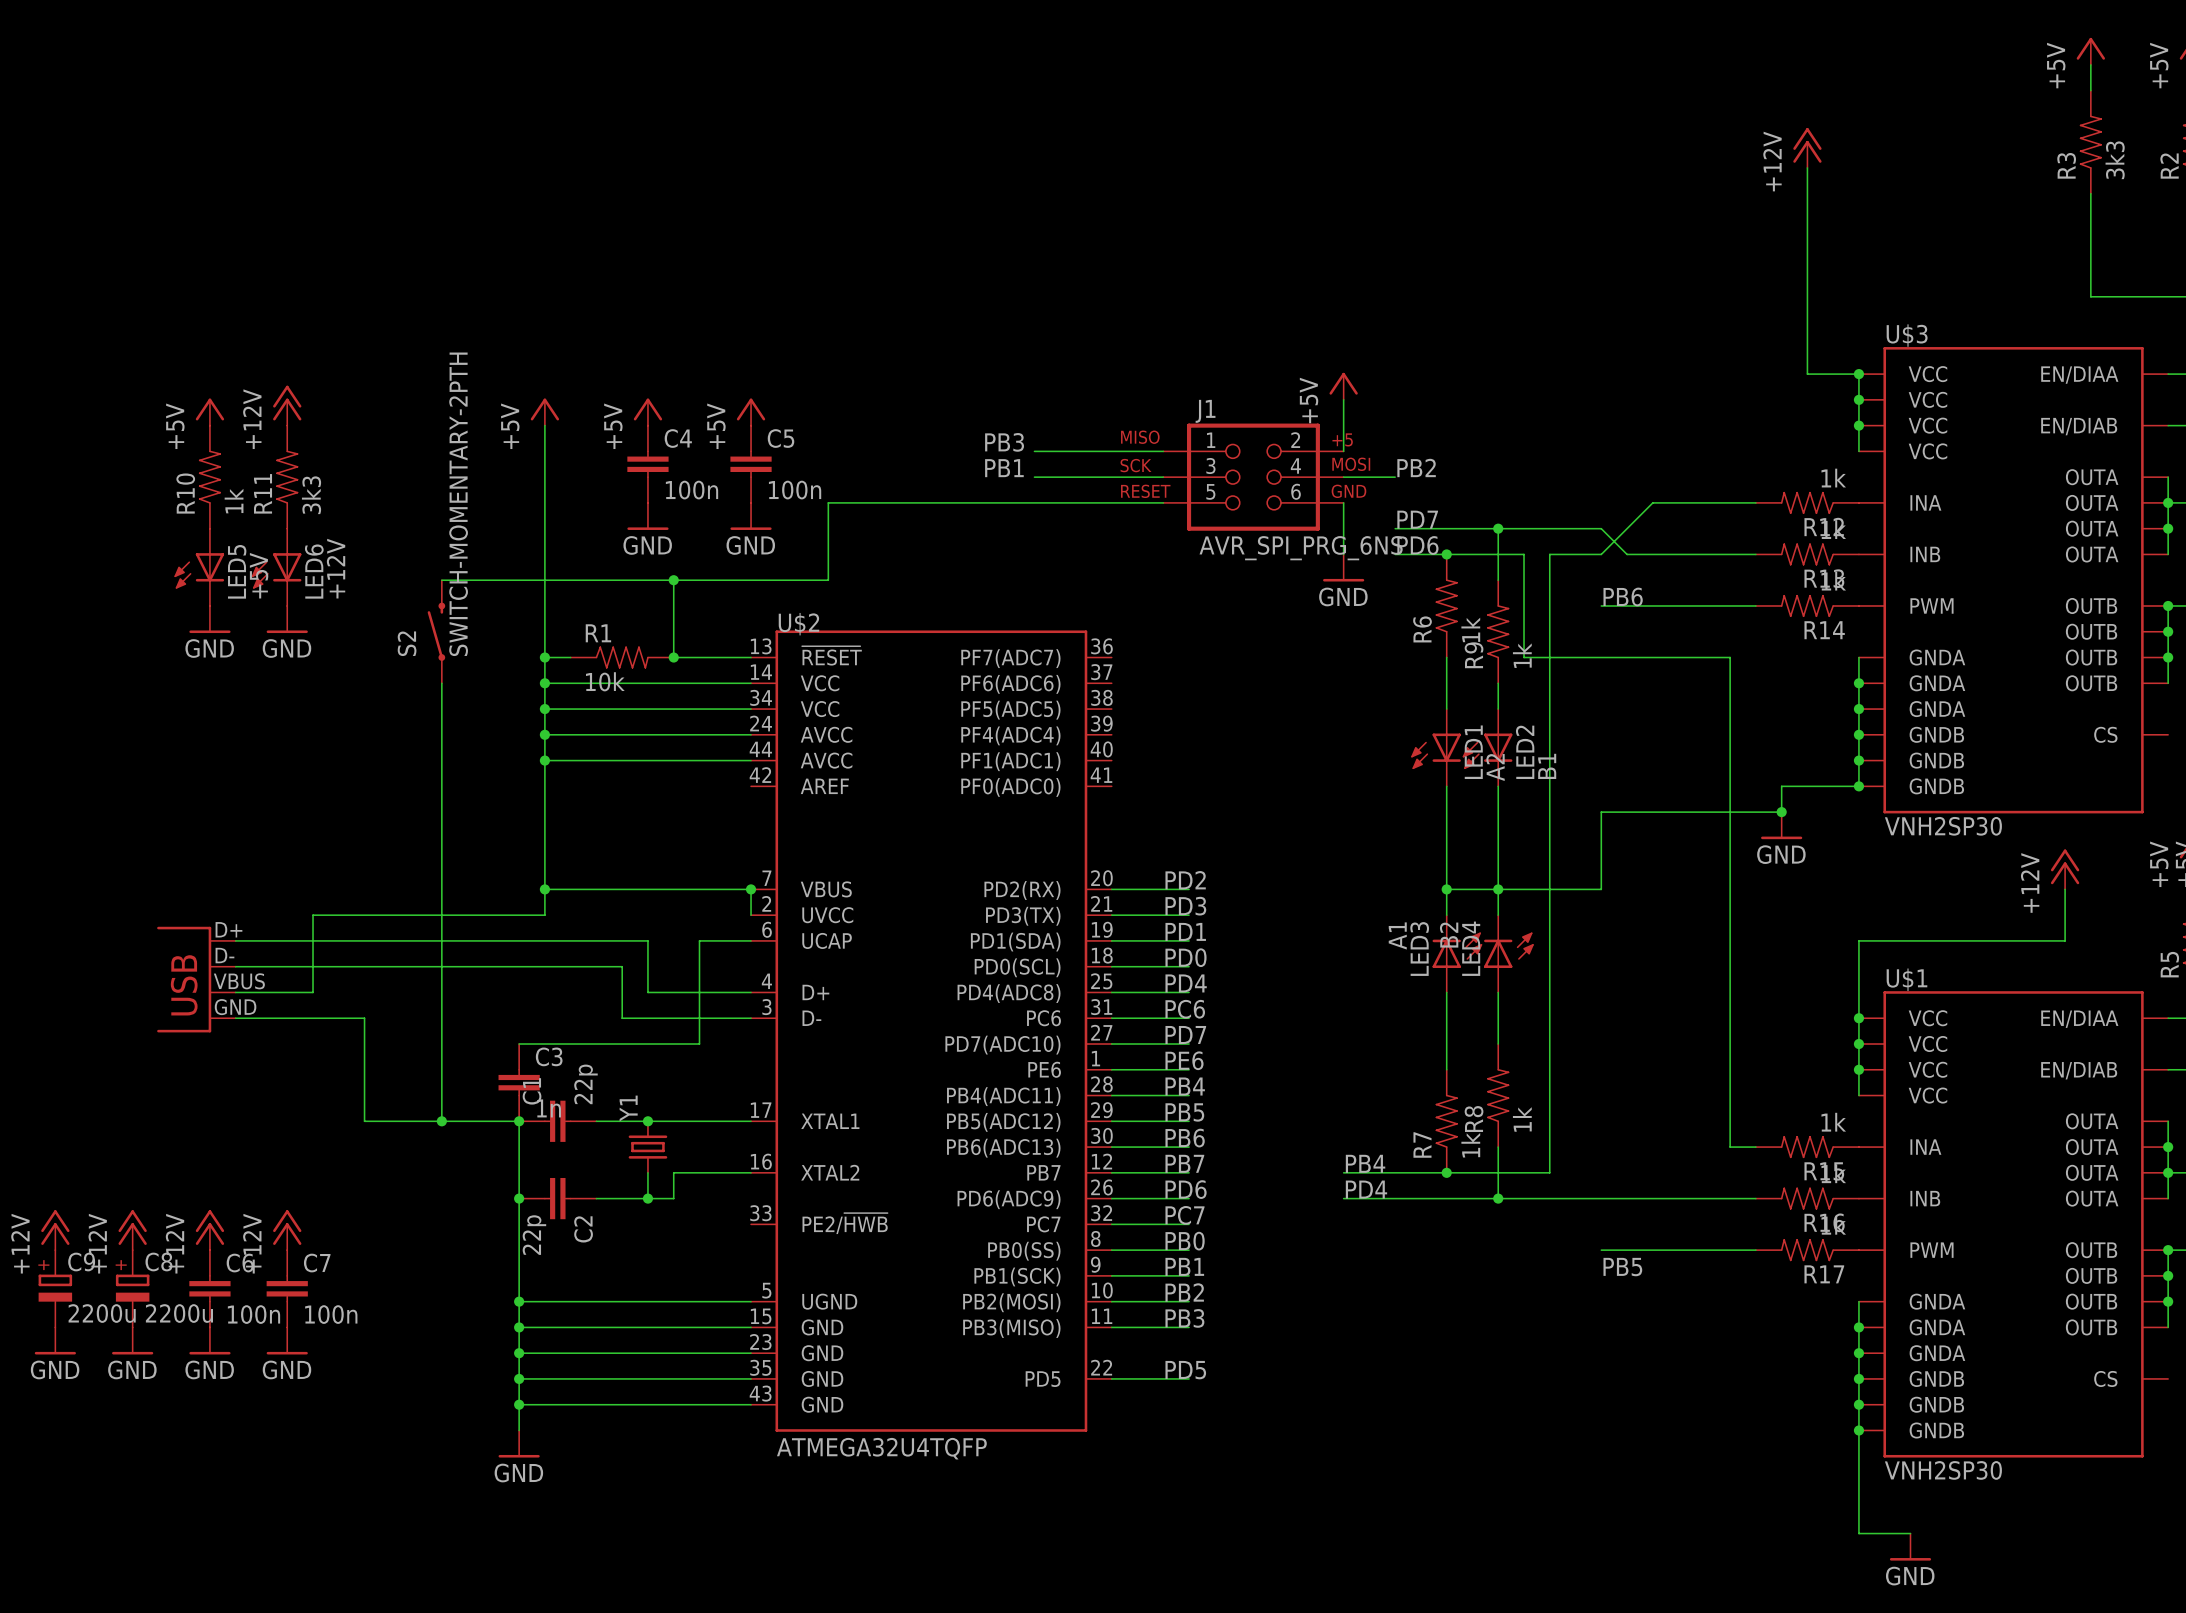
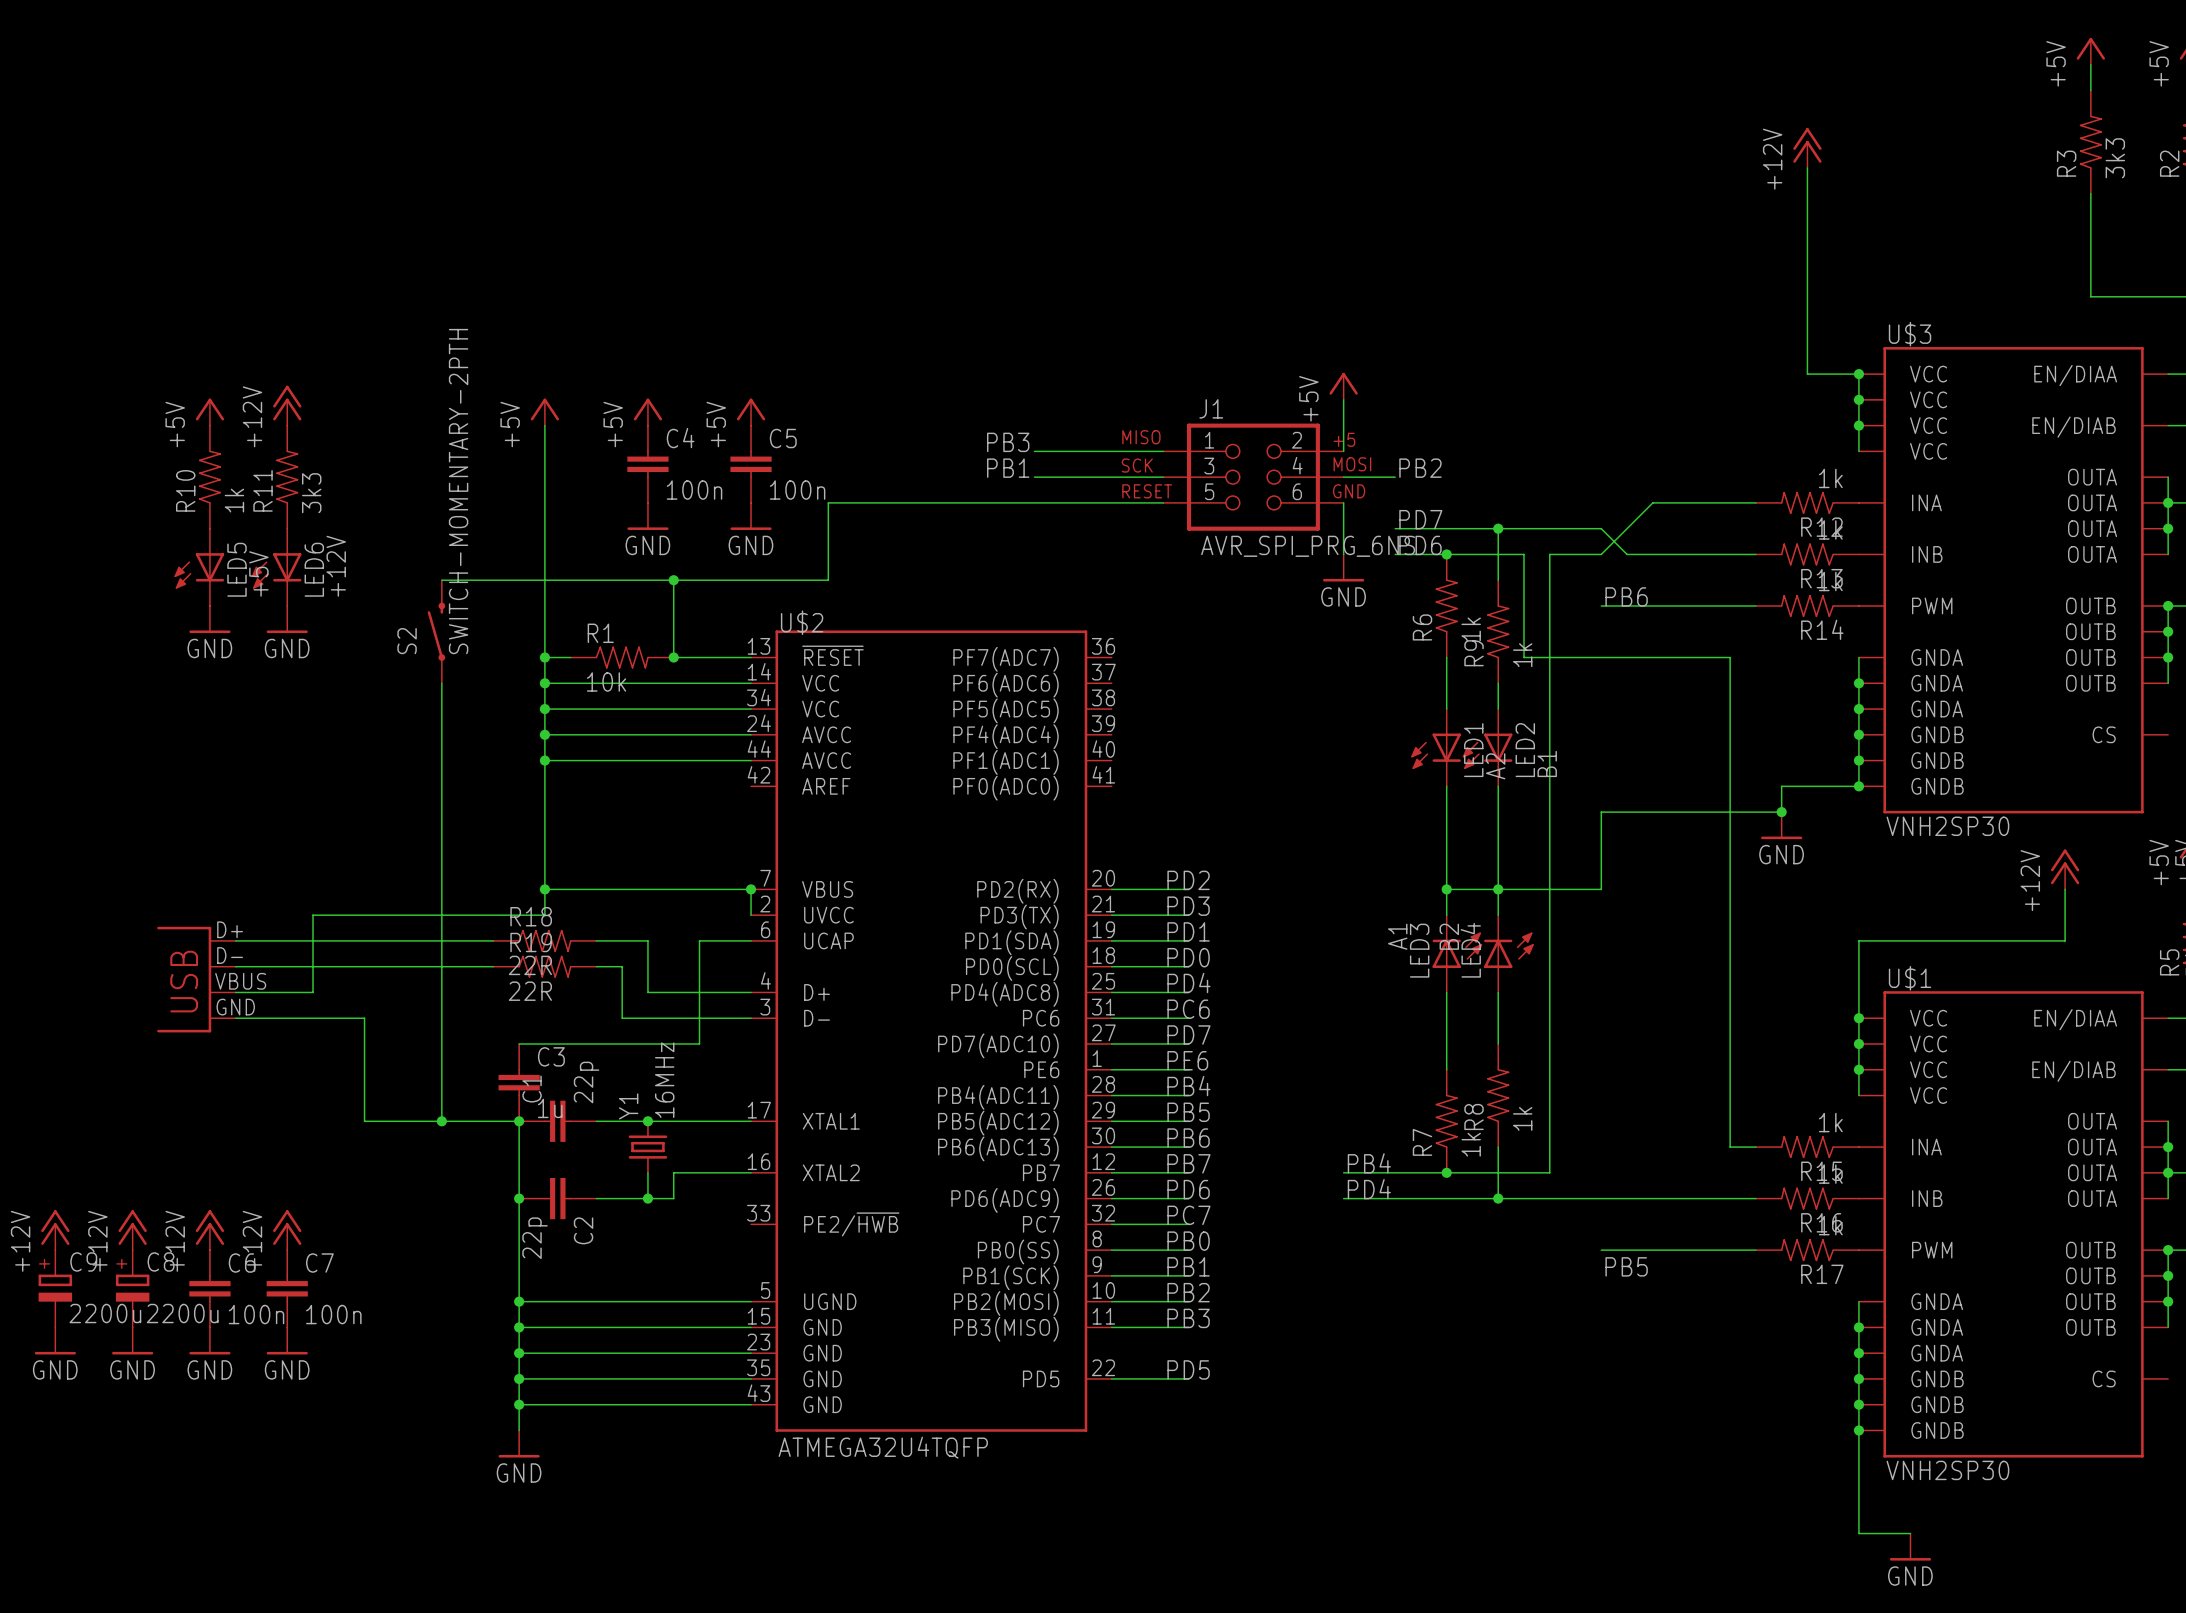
R18: none -> 22R (544, 940)
R19: none -> 22R (544, 966)
Y1 value: none -> 16MHz (664, 1080)
C3 value: 1n (549, 1108) -> 1u (550, 1108)

